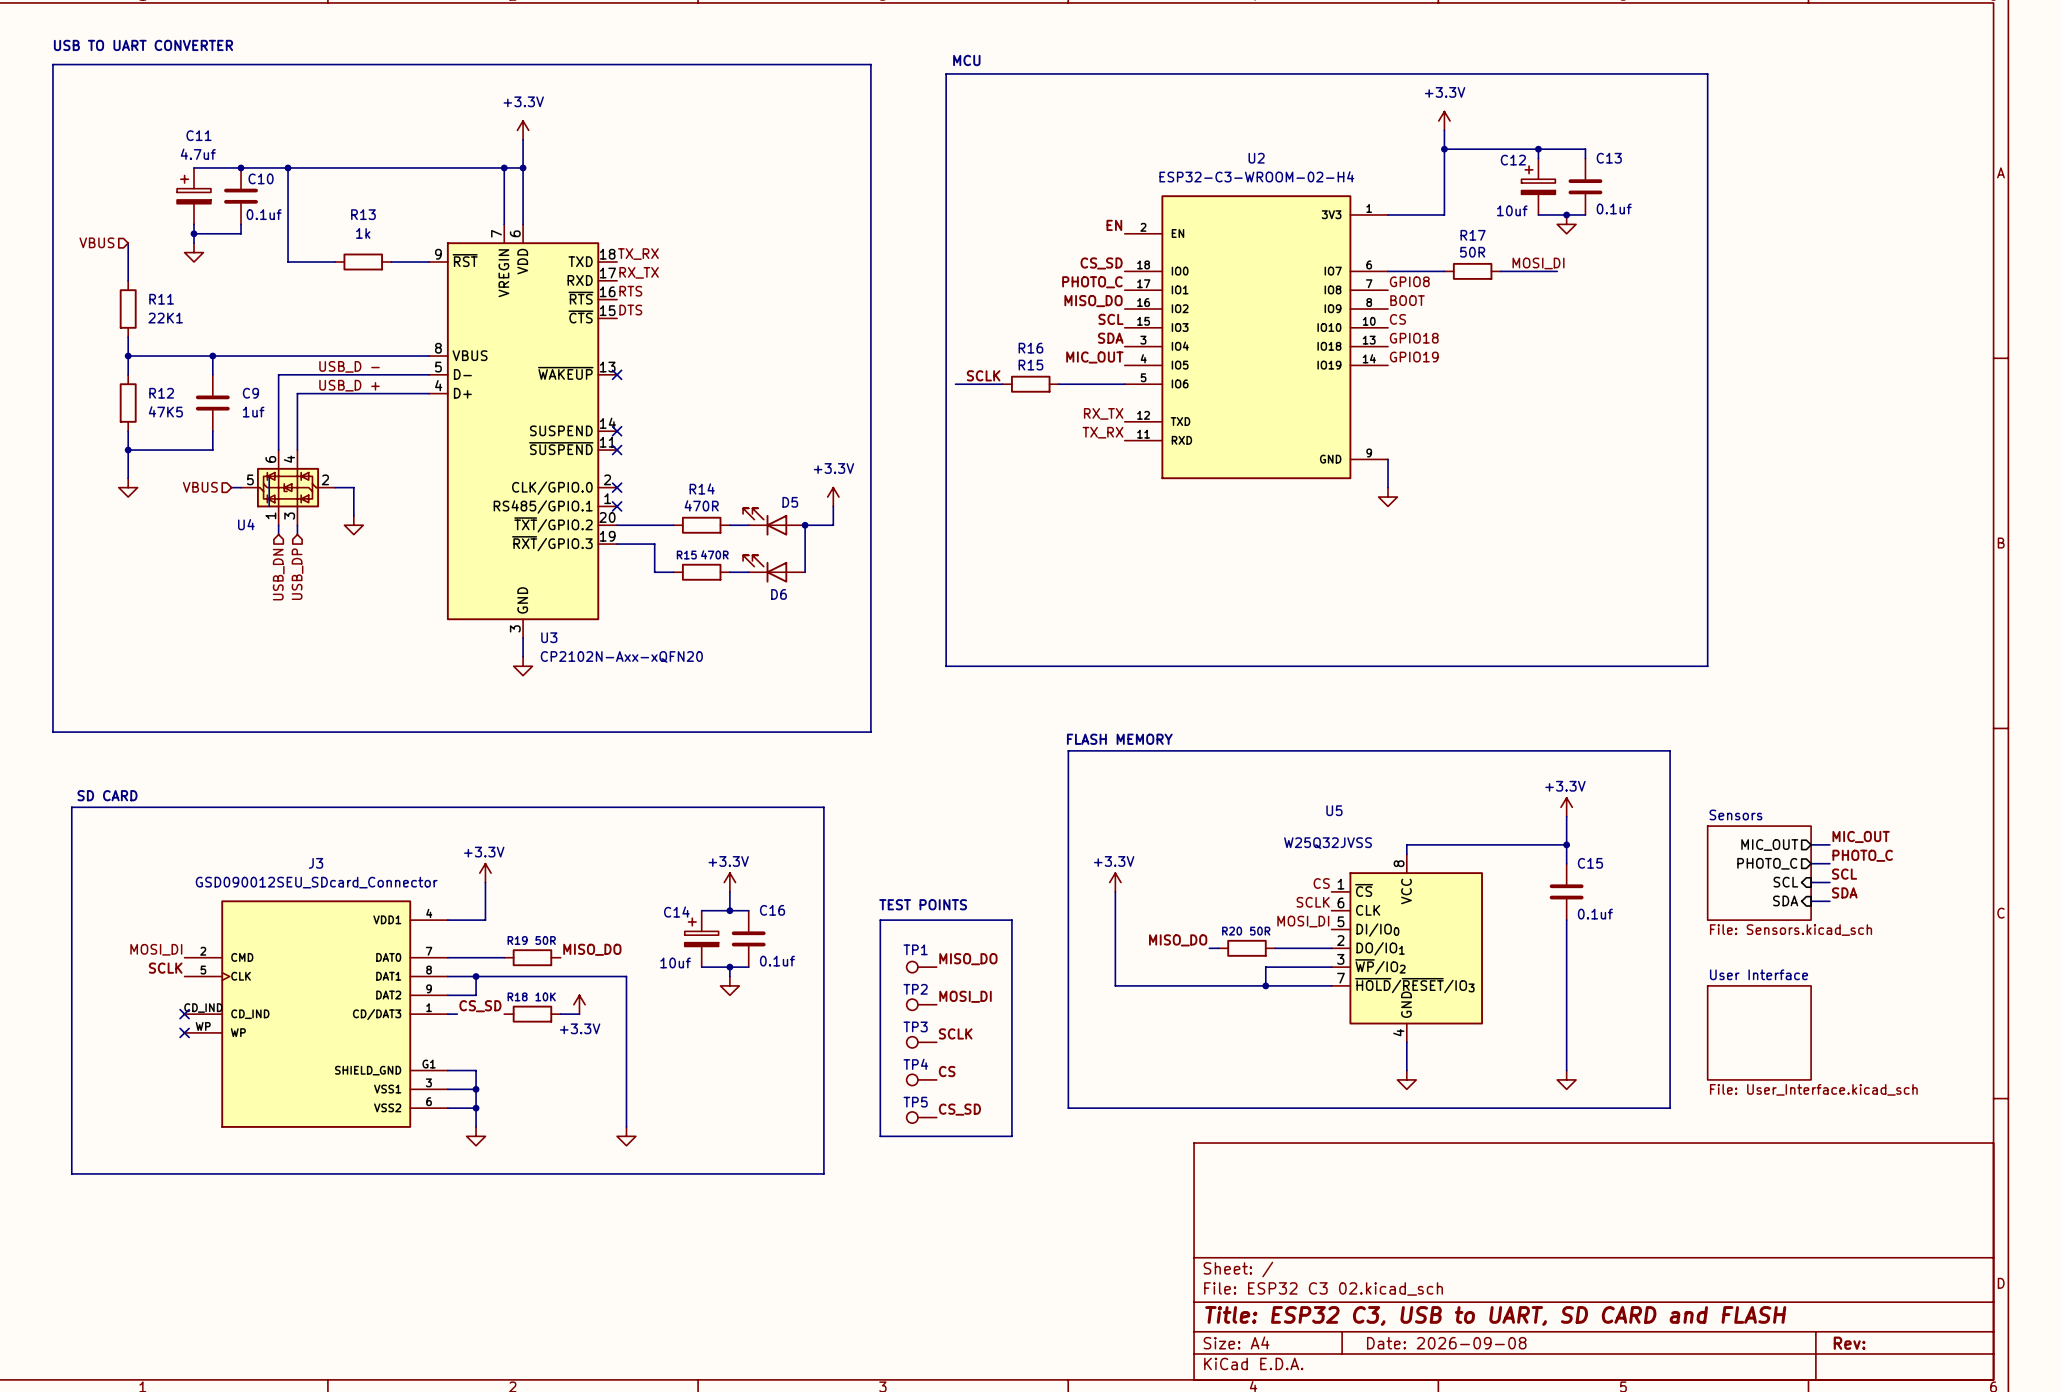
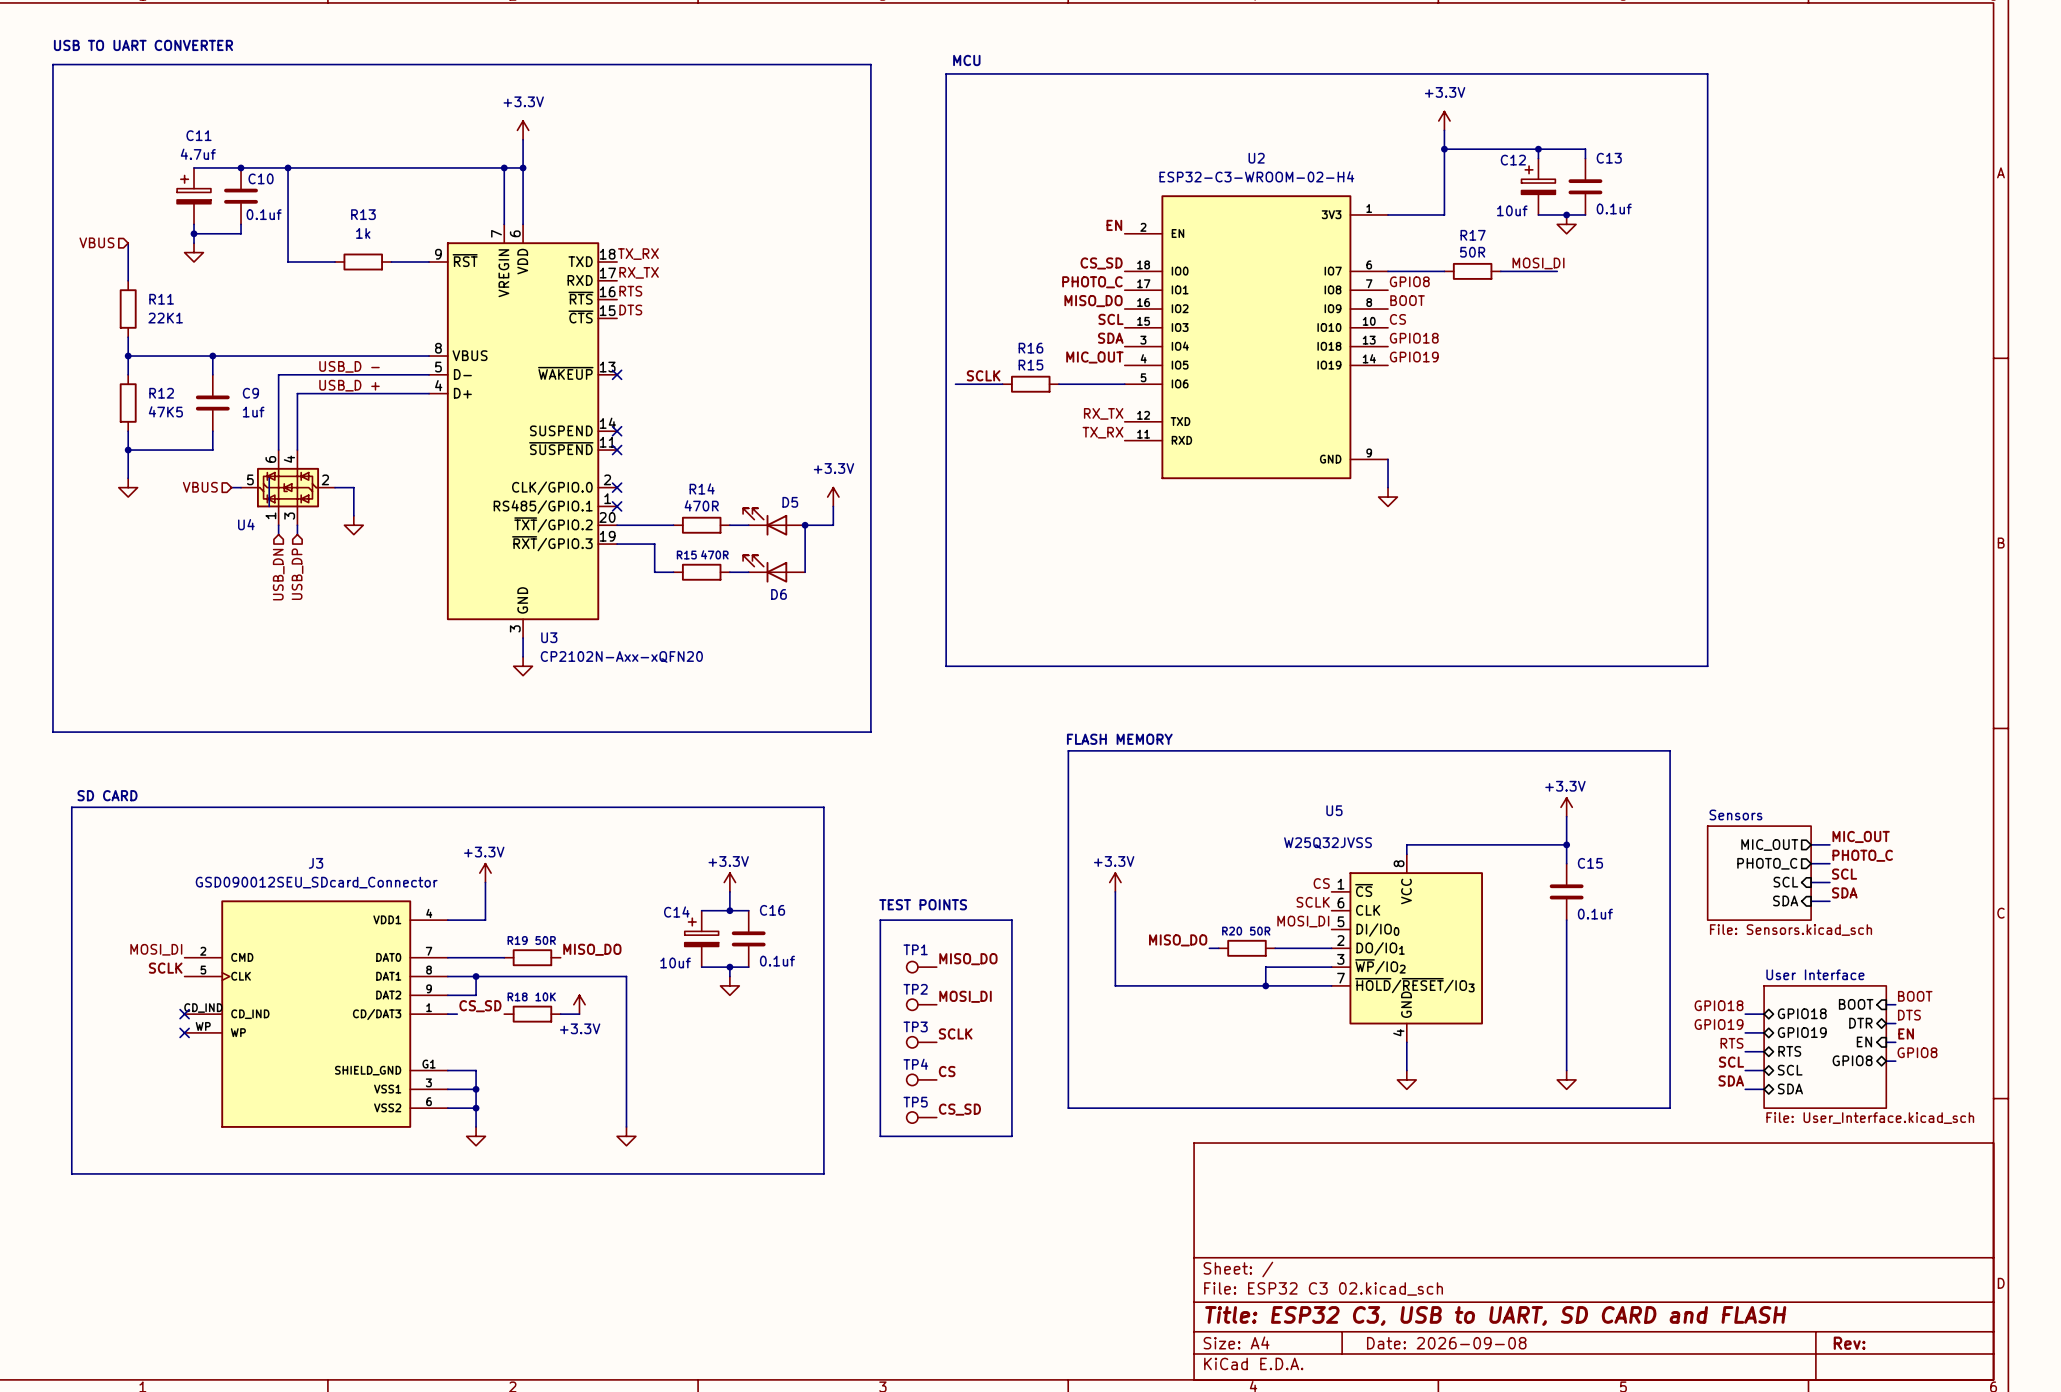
label: none -> BOOT (1915, 996)
sheet pin: none -> BOOT (1856, 1004)
wire: none -> (1886, 1004) (1895, 1004)
label: none -> GPIO18 (1719, 1005)
sheet pin: none -> GPIO18 (1802, 1013)
wire: none -> (1745, 1014) (1764, 1014)
label: none -> DTS (1909, 1015)
sheet pin: none -> DTR (1860, 1023)
wire: none -> (1886, 1023) (1895, 1023)
label: none -> GPIO19 (1719, 1024)
wire: none -> (1745, 1032) (1764, 1032)
sheet User Interface: File: User_Interface.kicad_sch (1759, 1032) -> none
sheet pin: none -> GPIO19 (1802, 1032)
label: none -> EN (1906, 1033)
sheet pin: none -> EN (1864, 1041)
wire: none -> (1886, 1042) (1895, 1042)
label: none -> RTS (1732, 1043)
sheet User Interface: none -> File: User_Interface.kicad_sch (1825, 1047)
wire: none -> (1745, 1051) (1764, 1051)
sheet pin: none -> RTS (1789, 1051)
label: none -> GPIO8 (1917, 1052)
sheet pin: none -> GPIO8 (1852, 1060)
wire: none -> (1886, 1061) (1895, 1061)
label: none -> SCL (1731, 1062)
wire: none -> (1745, 1070) (1764, 1070)
sheet pin: none -> SCL (1790, 1070)
label: none -> SDA (1731, 1080)
sheet pin: none -> SDA (1790, 1088)
wire: none -> (1745, 1089) (1764, 1089)

